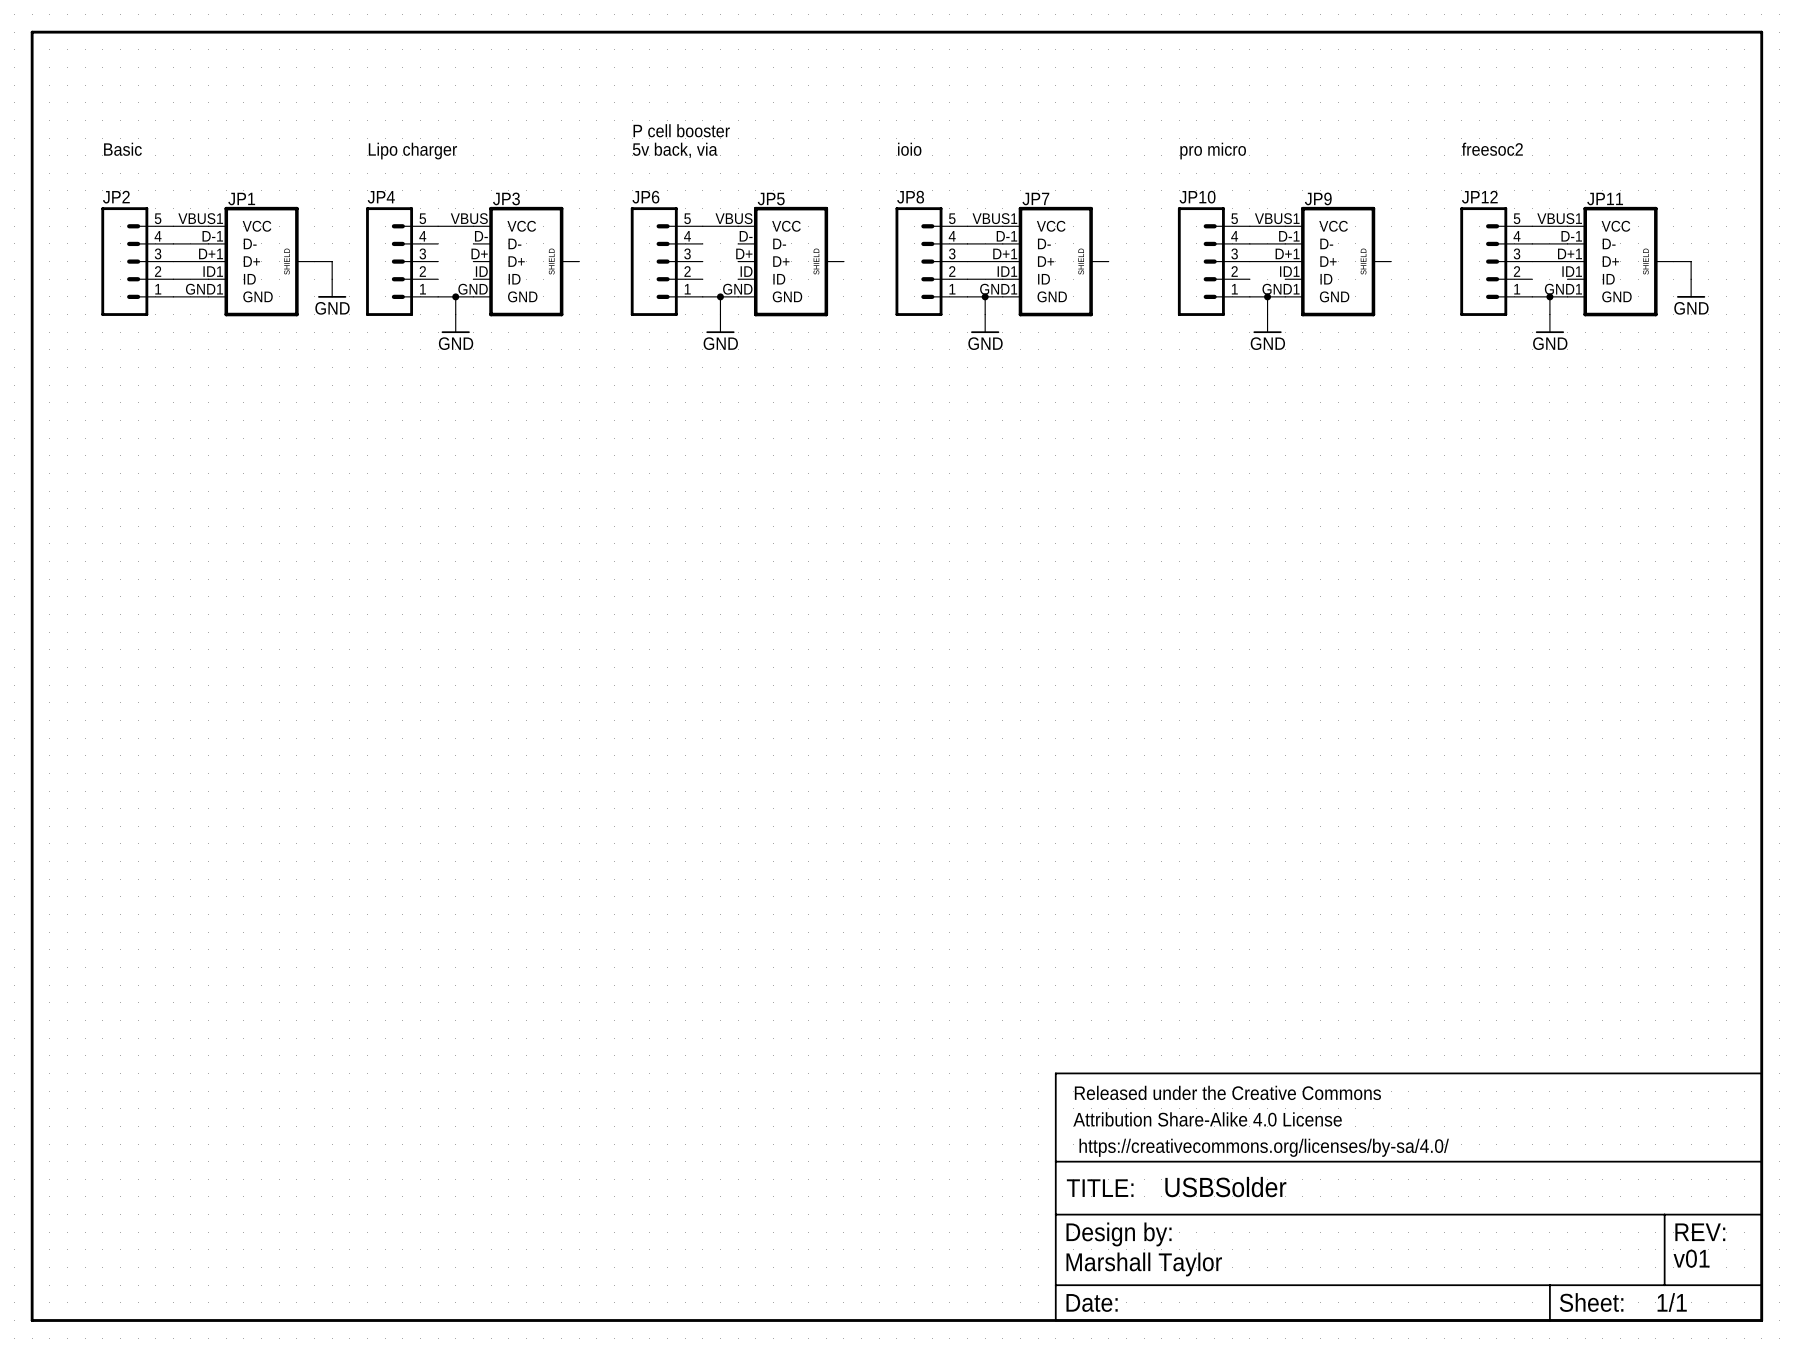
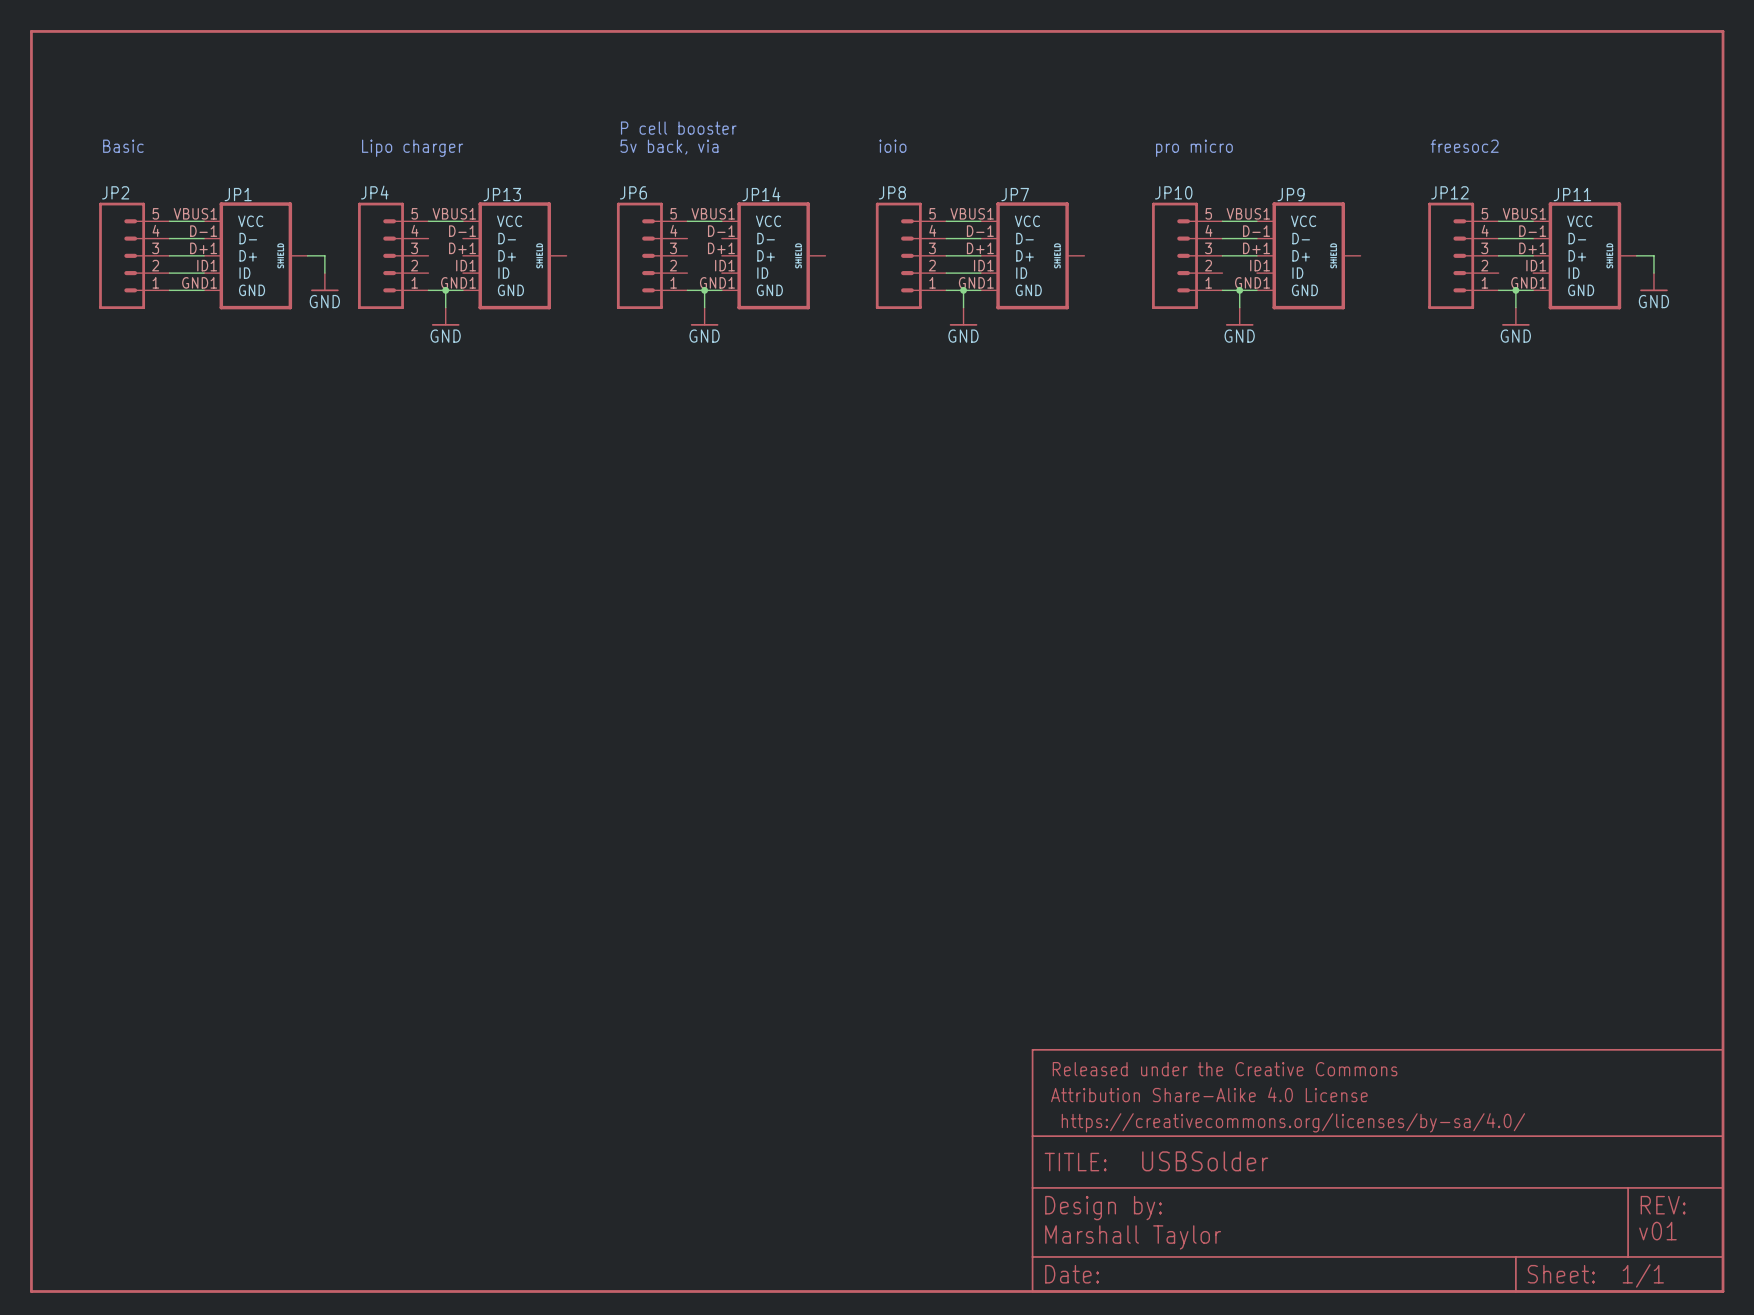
JP3 name: JP3 (506, 198) -> JP13 (502, 194)
JP5 name: JP5 (771, 199) -> JP14 (761, 194)
JP3 pin number: VBUS (469, 218) -> VBUS1 (454, 213)
JP5 pin number: VBUS (734, 218) -> VBUS1 (713, 213)
JP3 pin number: D- (481, 236) -> D-1 (462, 231)
JP5 pin number: D- (746, 236) -> D-1 (721, 231)
JP3 pin number: D+ (479, 253) -> D+1 (462, 248)
JP5 pin number: D+ (744, 253) -> D+1 (721, 248)
JP3 pin number: ID (481, 271) -> ID1 (466, 265)
JP5 pin number: ID (746, 271) -> ID1 (724, 265)
JP3 pin number: GND (473, 289) -> GND1 (458, 282)
JP5 pin number: GND (737, 289) -> GND1 (717, 282)

